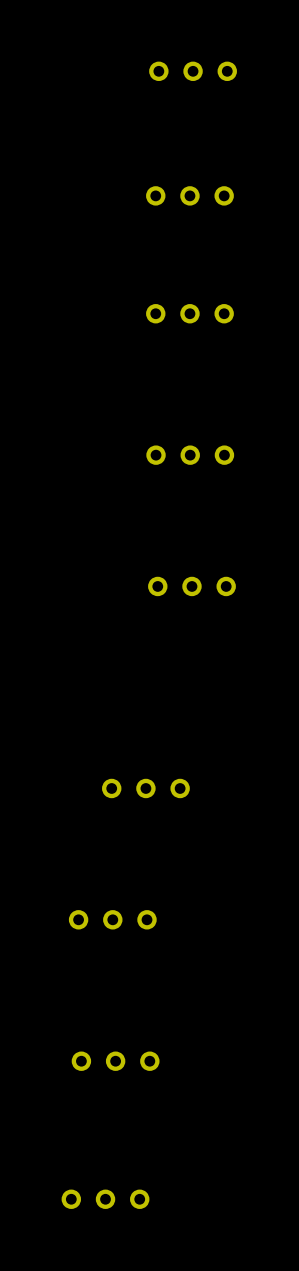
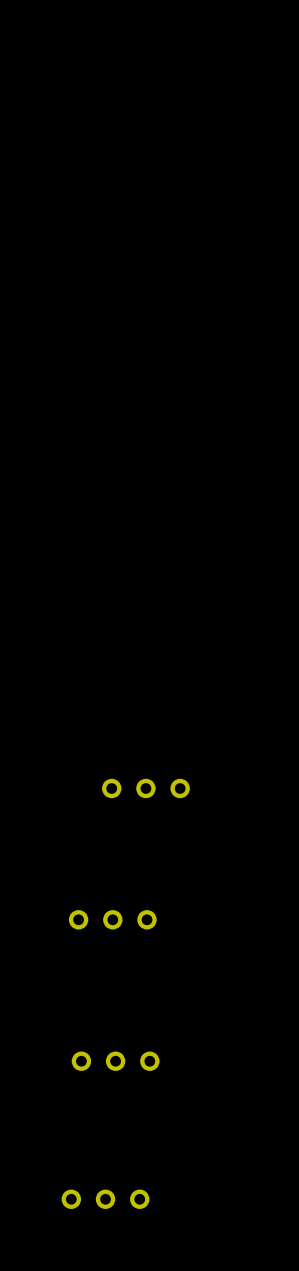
part: (193, 71) -> none
part: (189, 195) -> none
part: (189, 313) -> none
part: (190, 455) -> none
part: (191, 586) -> none

